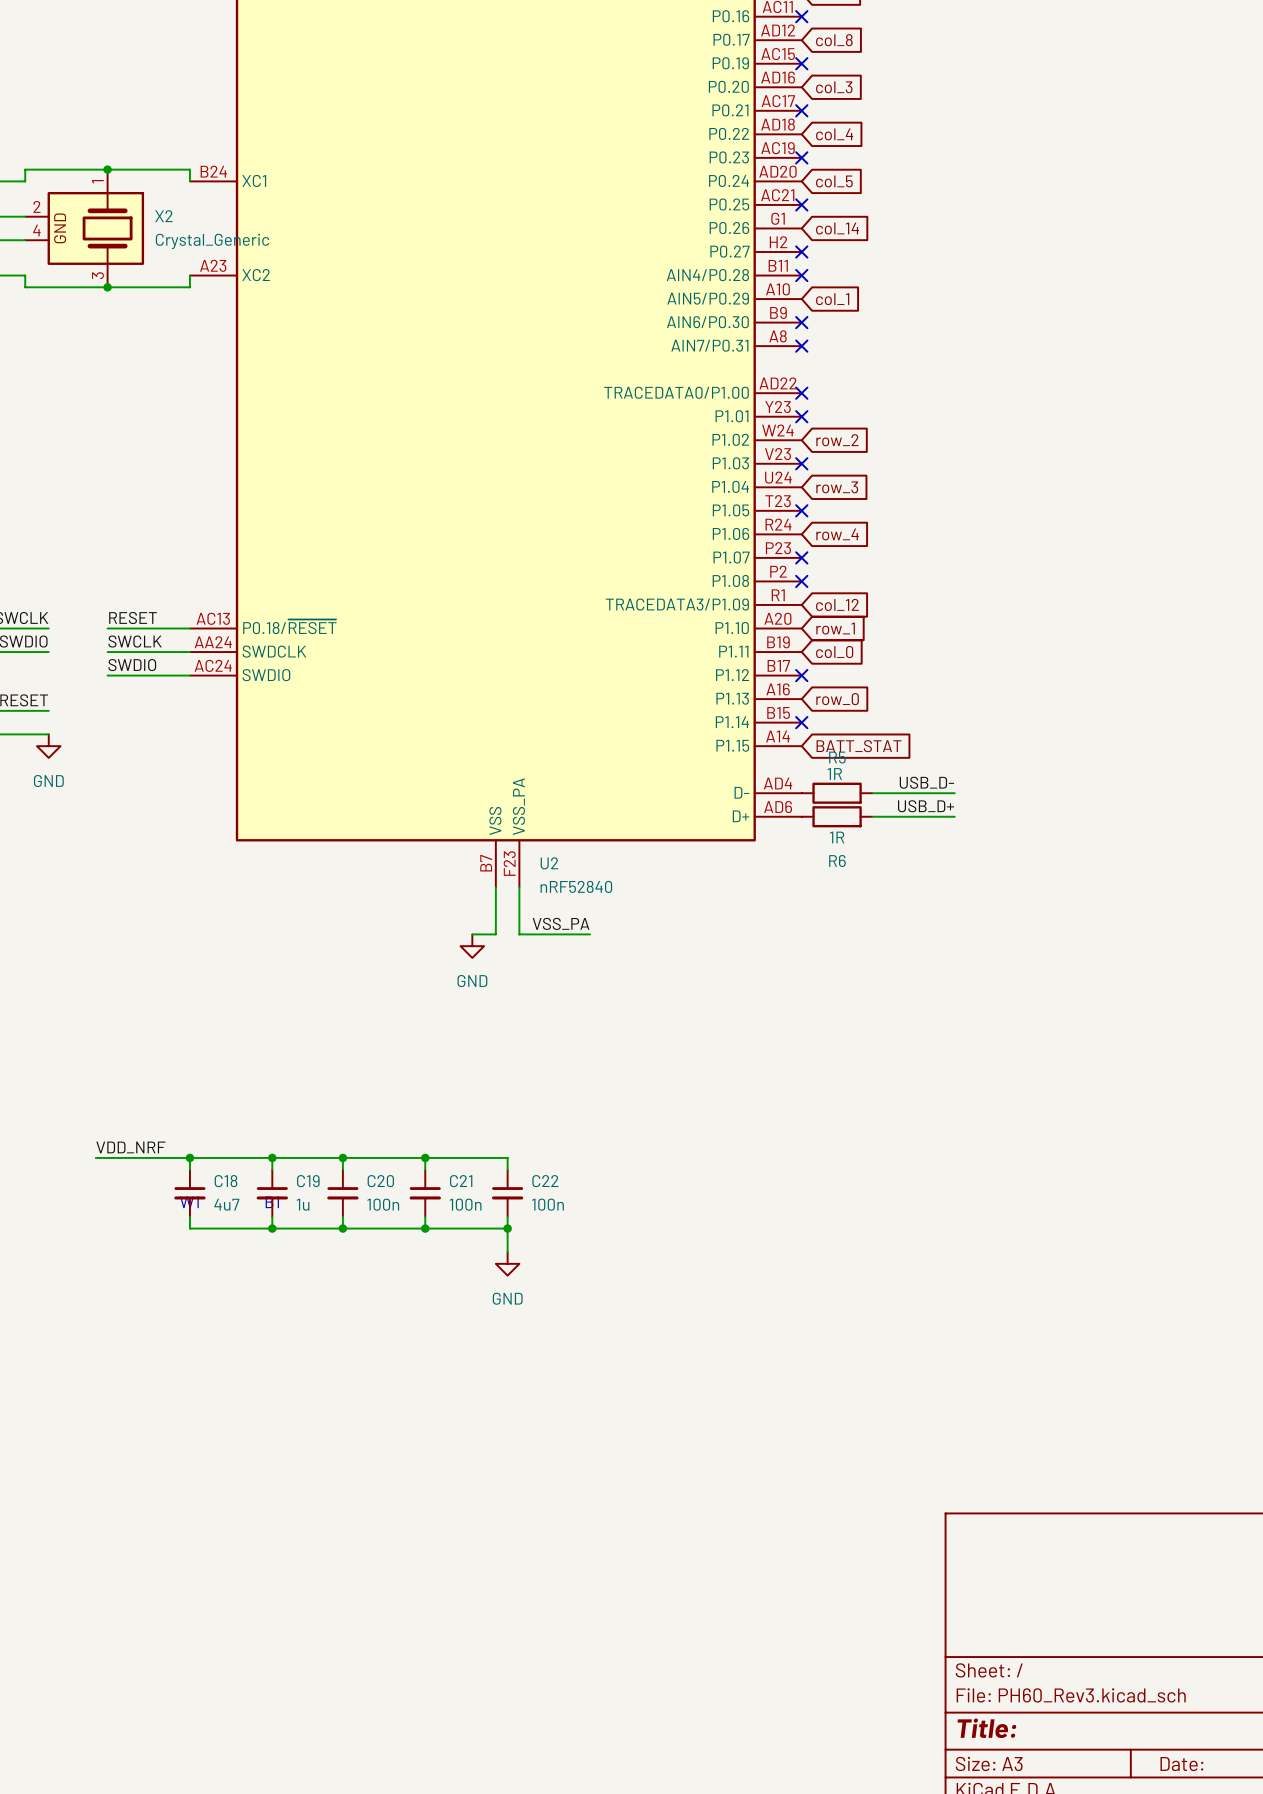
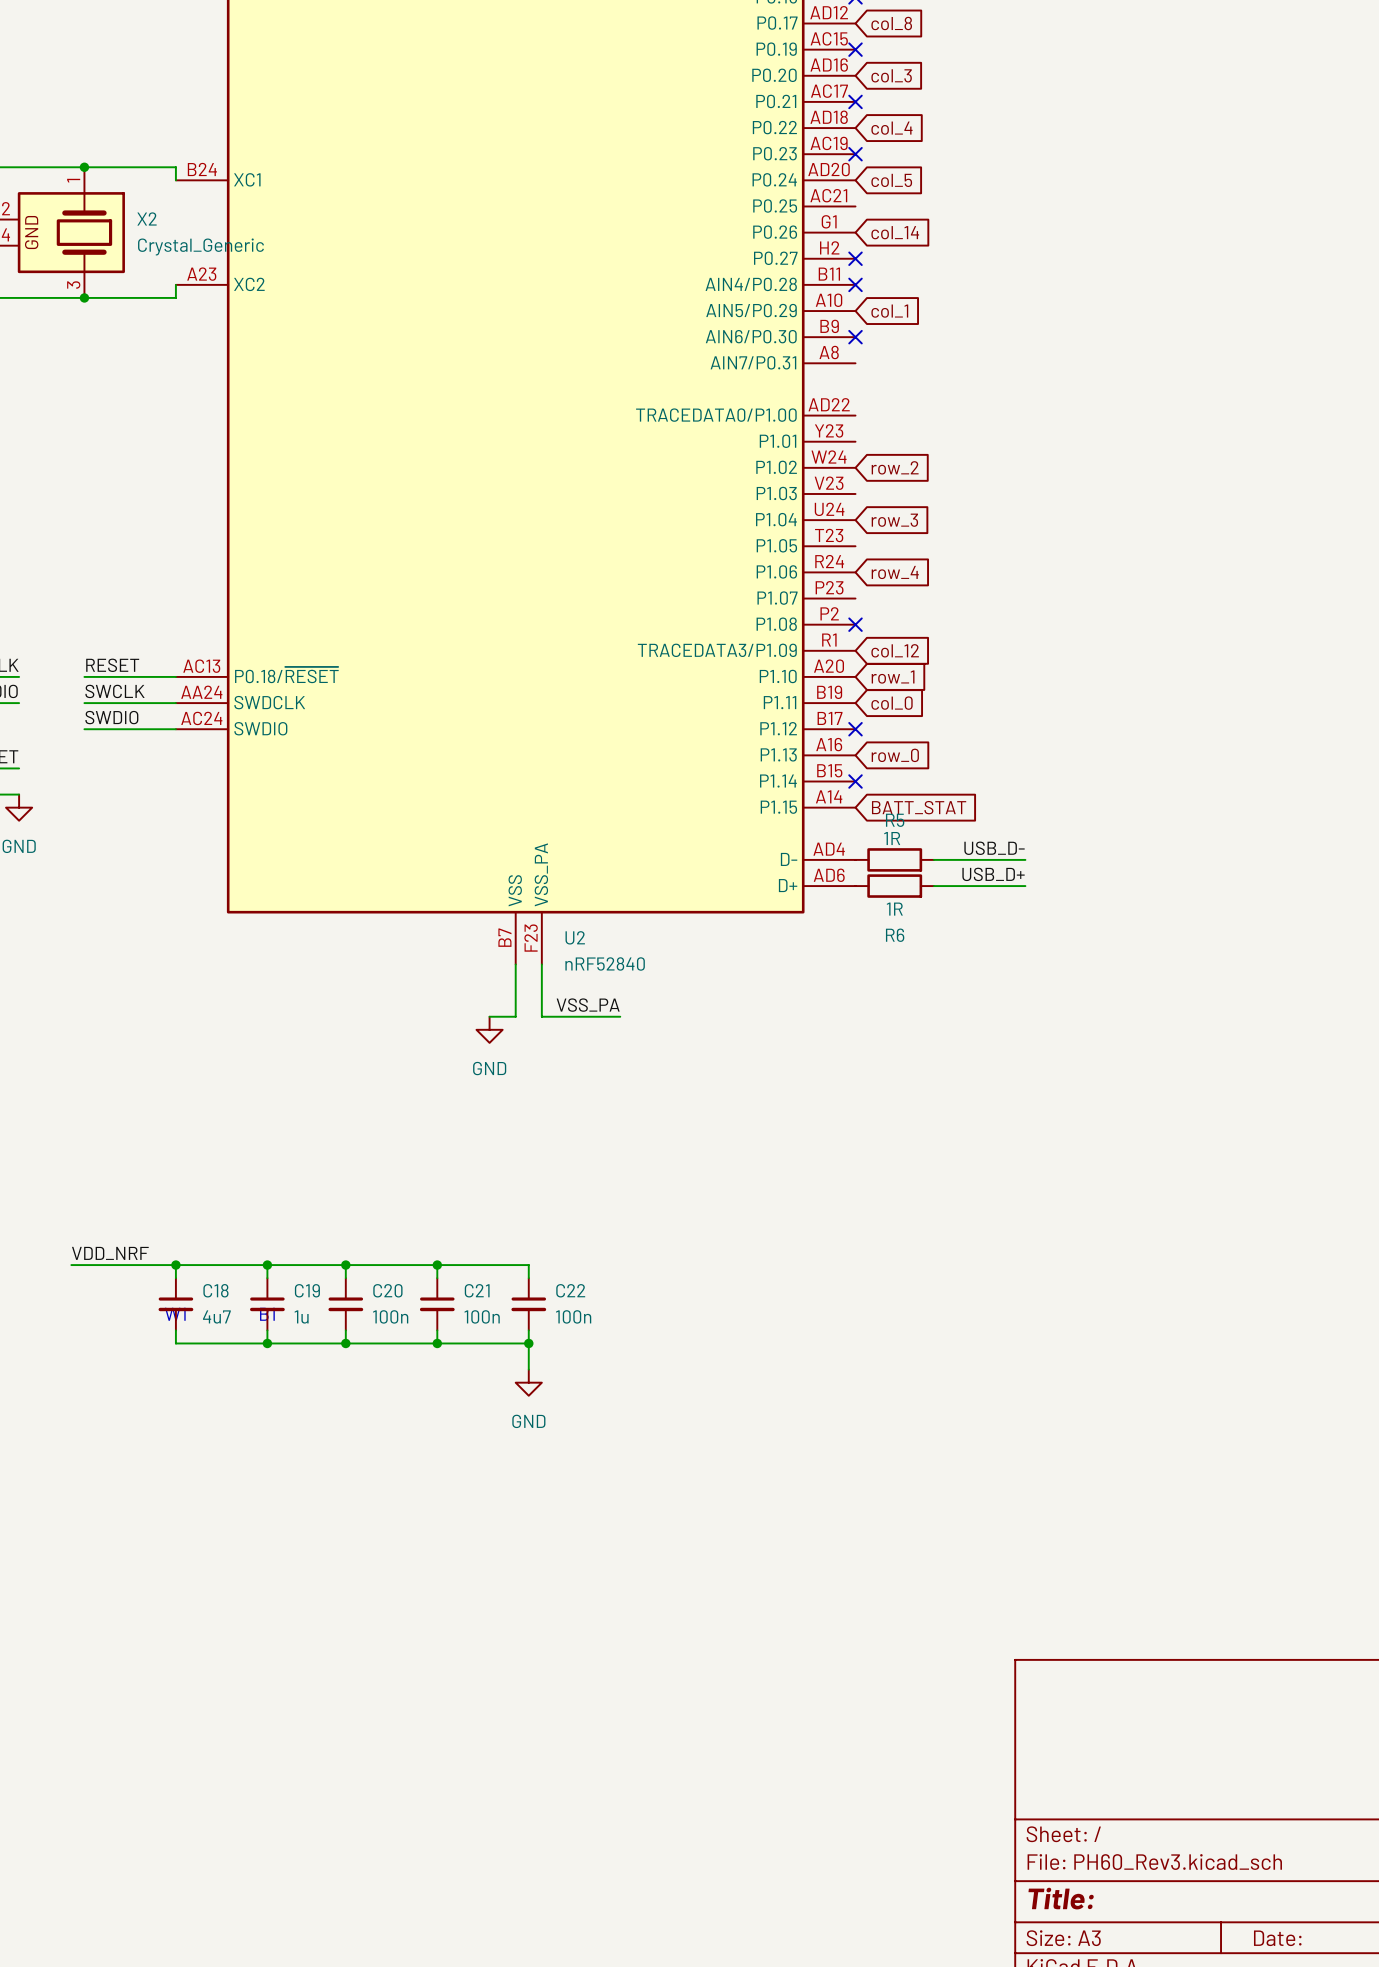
no-connect mark: (801, 204) -> none
no-connect mark: (801, 346) -> none
no-connect mark: (801, 393) -> none
no-connect mark: (801, 416) -> none
no-connect mark: (801, 463) -> none
no-connect mark: (801, 510) -> none
no-connect mark: (801, 557) -> none

